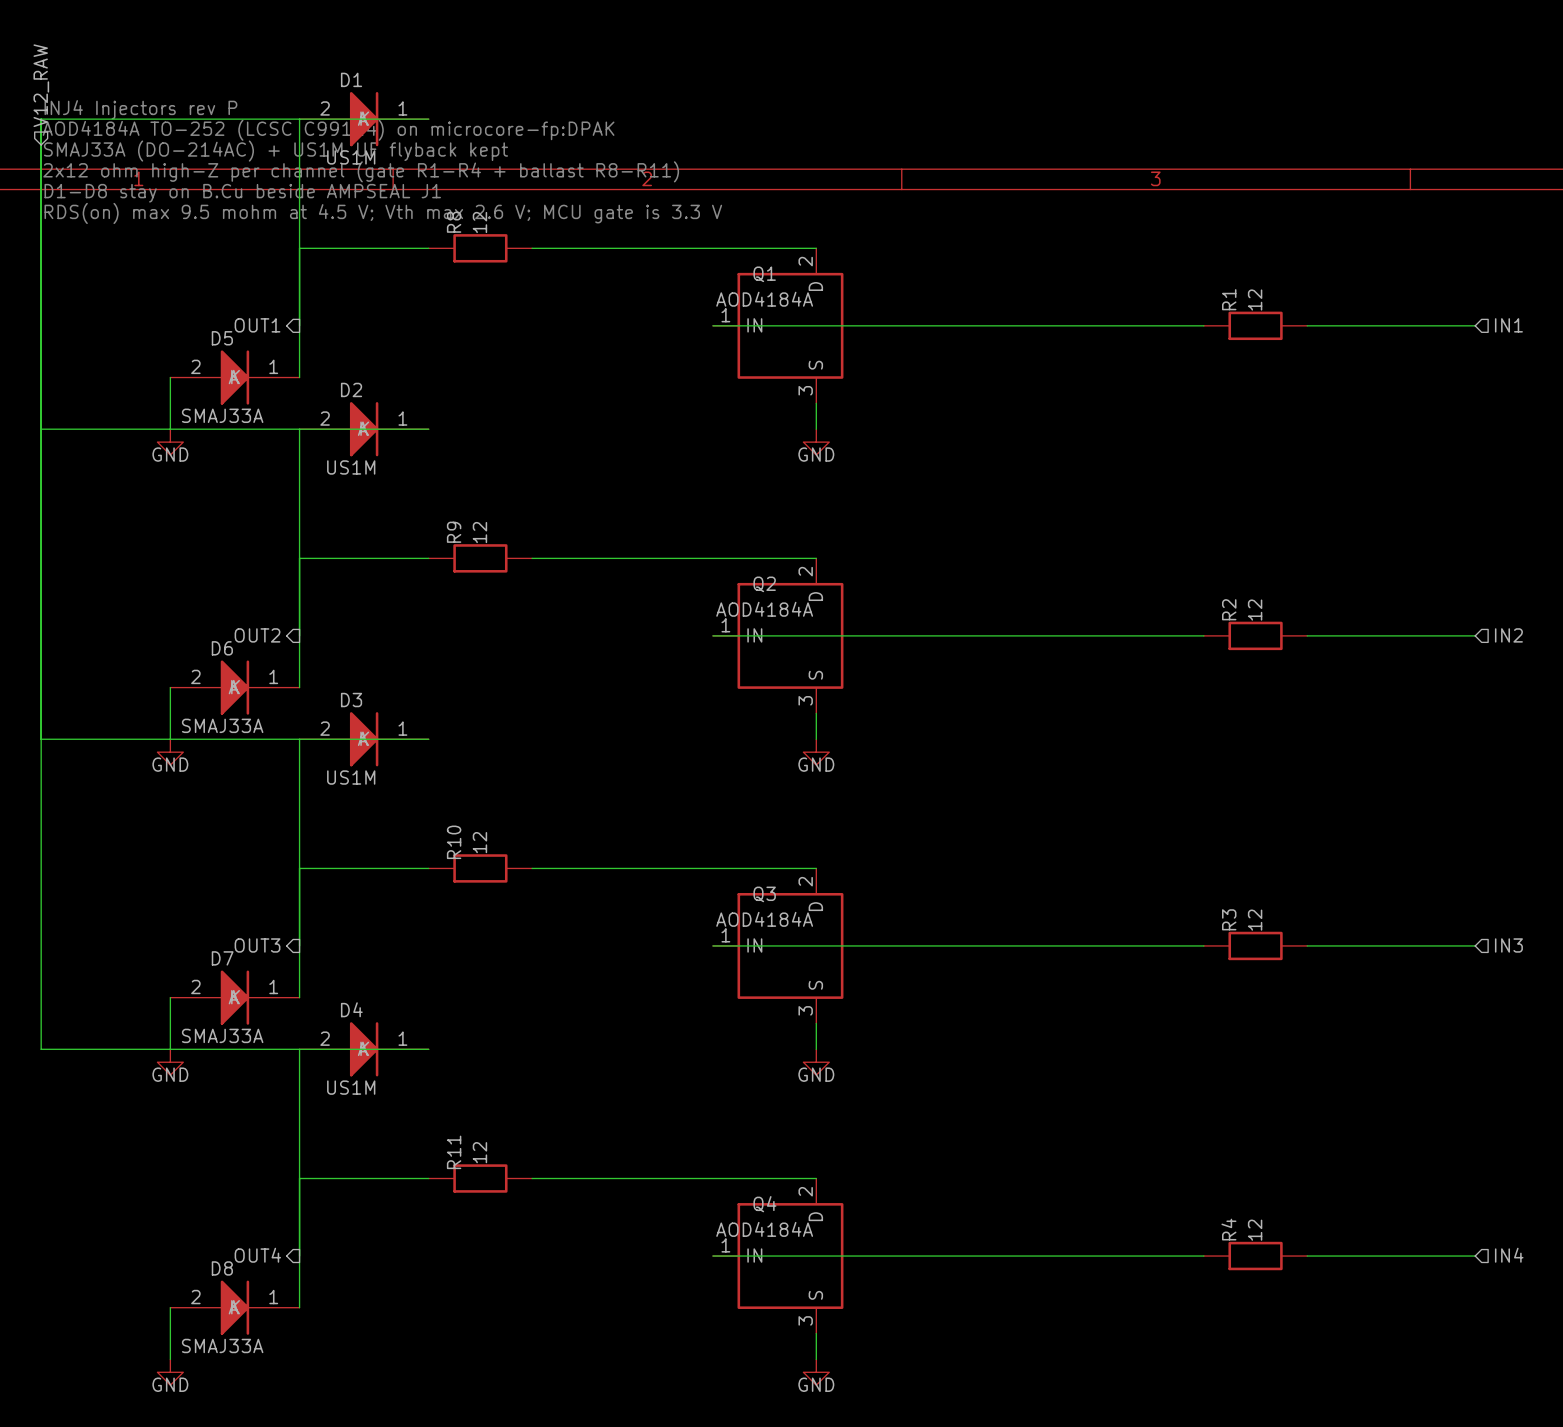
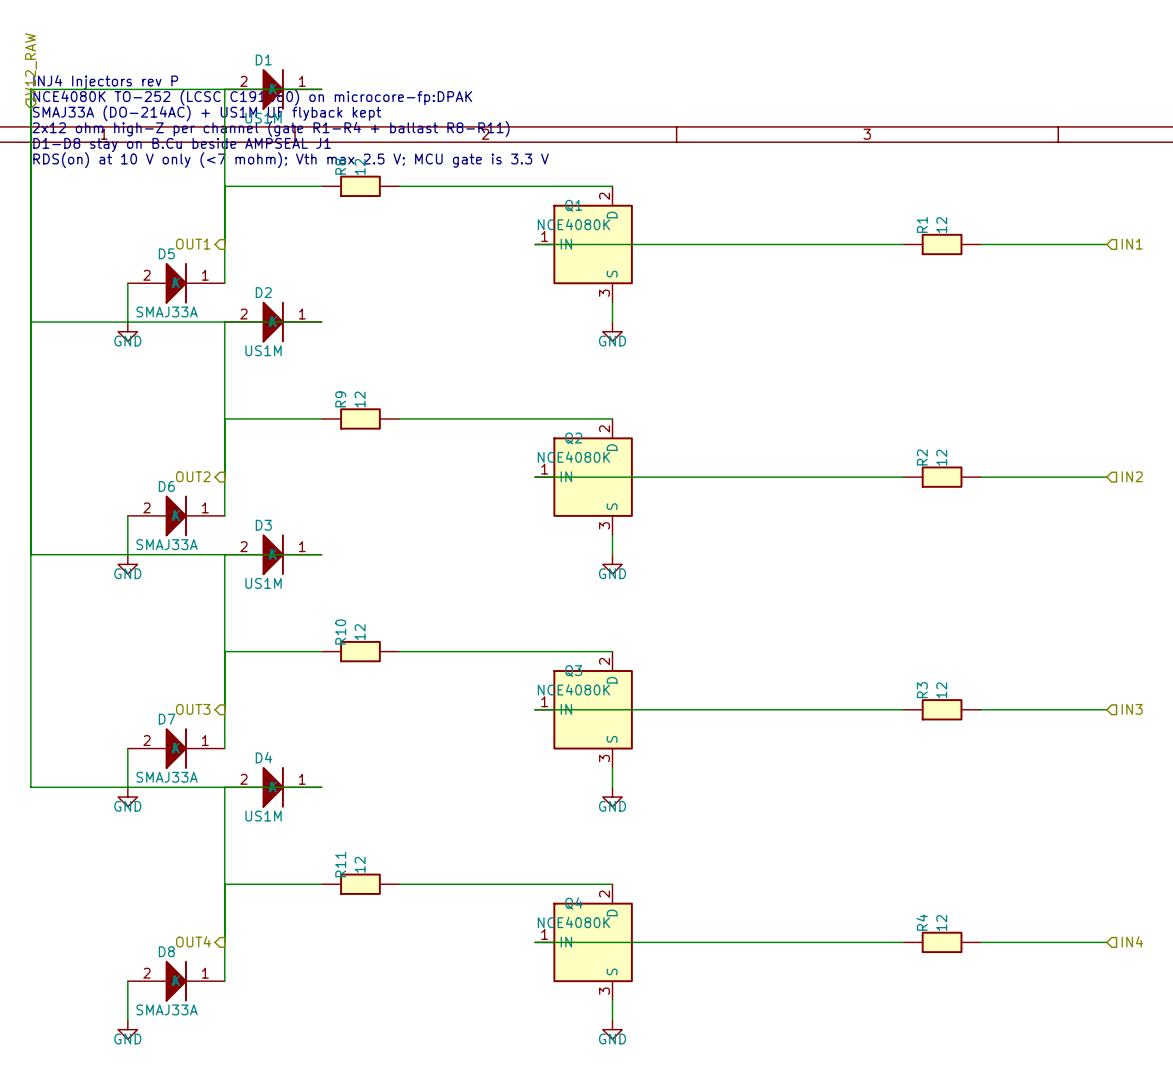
text: AOD4184A TO-252 (LCSC C99124) on microcore-fp:DPAK (328, 130) -> NCE4080K TO-252 (LCSC C191380) on microcore-fp:DPAK (252, 97)
text: RDS(on) max 9.5 mohm at 4.5 V; Vth max 2.6 V; MCU gate is 3.3 V (383, 213) -> RDS(on) at 10 V only (<7 mohm); Vth max 2.5 V; MCU gate is 3.3 V (291, 160)
Q1 value: AOD4184A (764, 299) -> NCE4080K (573, 224)
Q2 value: AOD4184A (764, 609) -> NCE4080K (573, 457)
Q3 value: AOD4184A (764, 919) -> NCE4080K (573, 689)
Q4 value: AOD4184A (764, 1229) -> NCE4080K (573, 922)

